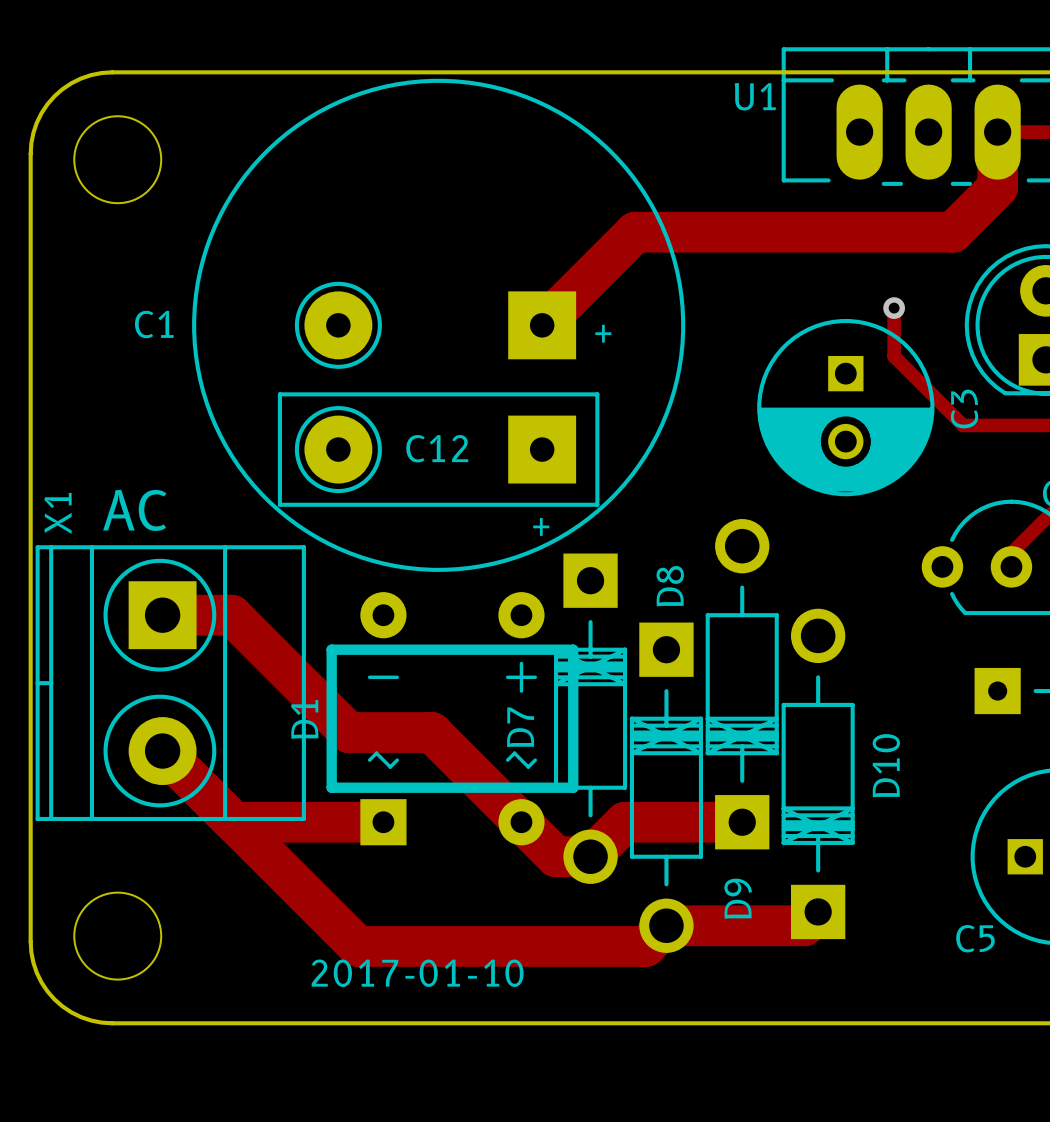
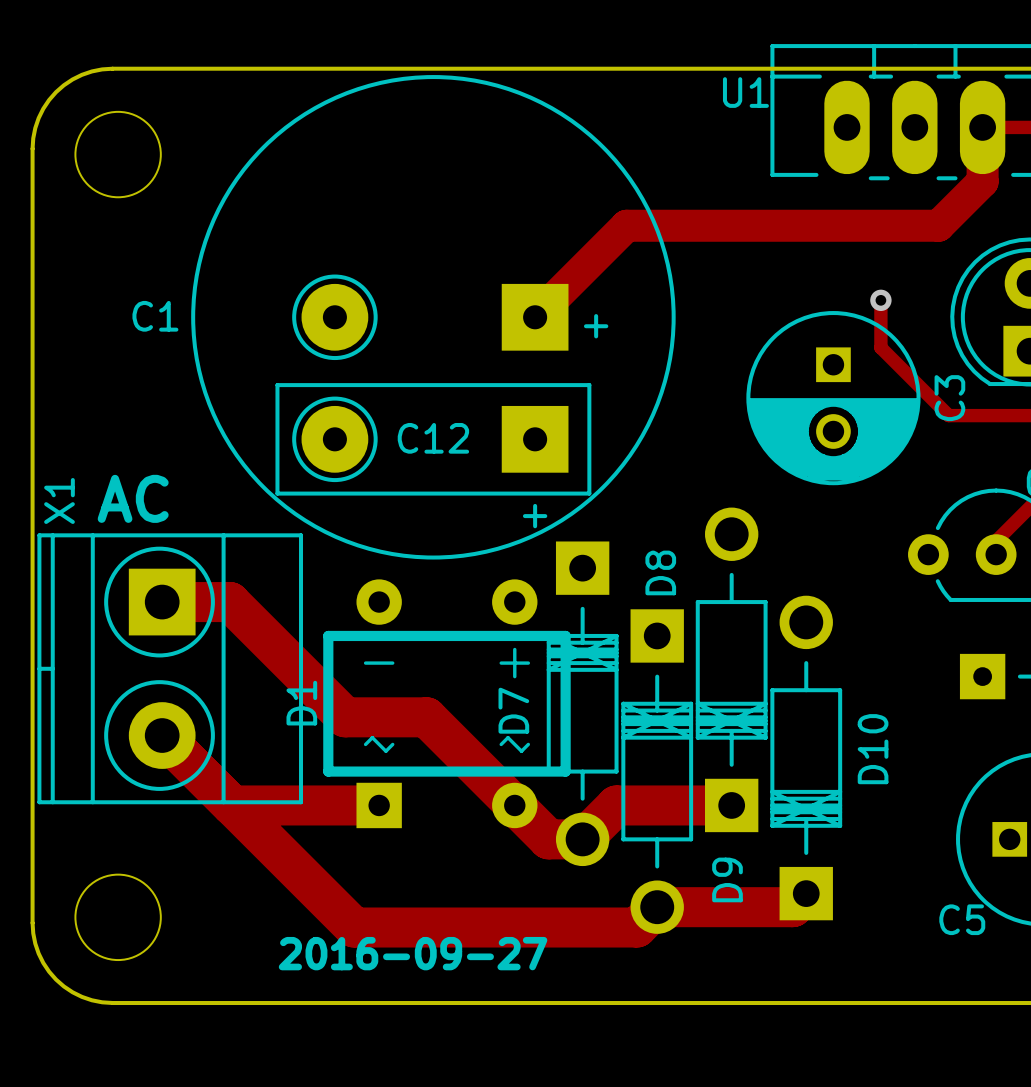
track width: thick (997, 132) (997, 187) (952, 232) (635, 232) (542, 325) -> thin (982, 127) (982, 181) (938, 225) (626, 225) (535, 317)
text: 2017-01-10 (417, 973) -> 2016-09-27 (413, 953)

